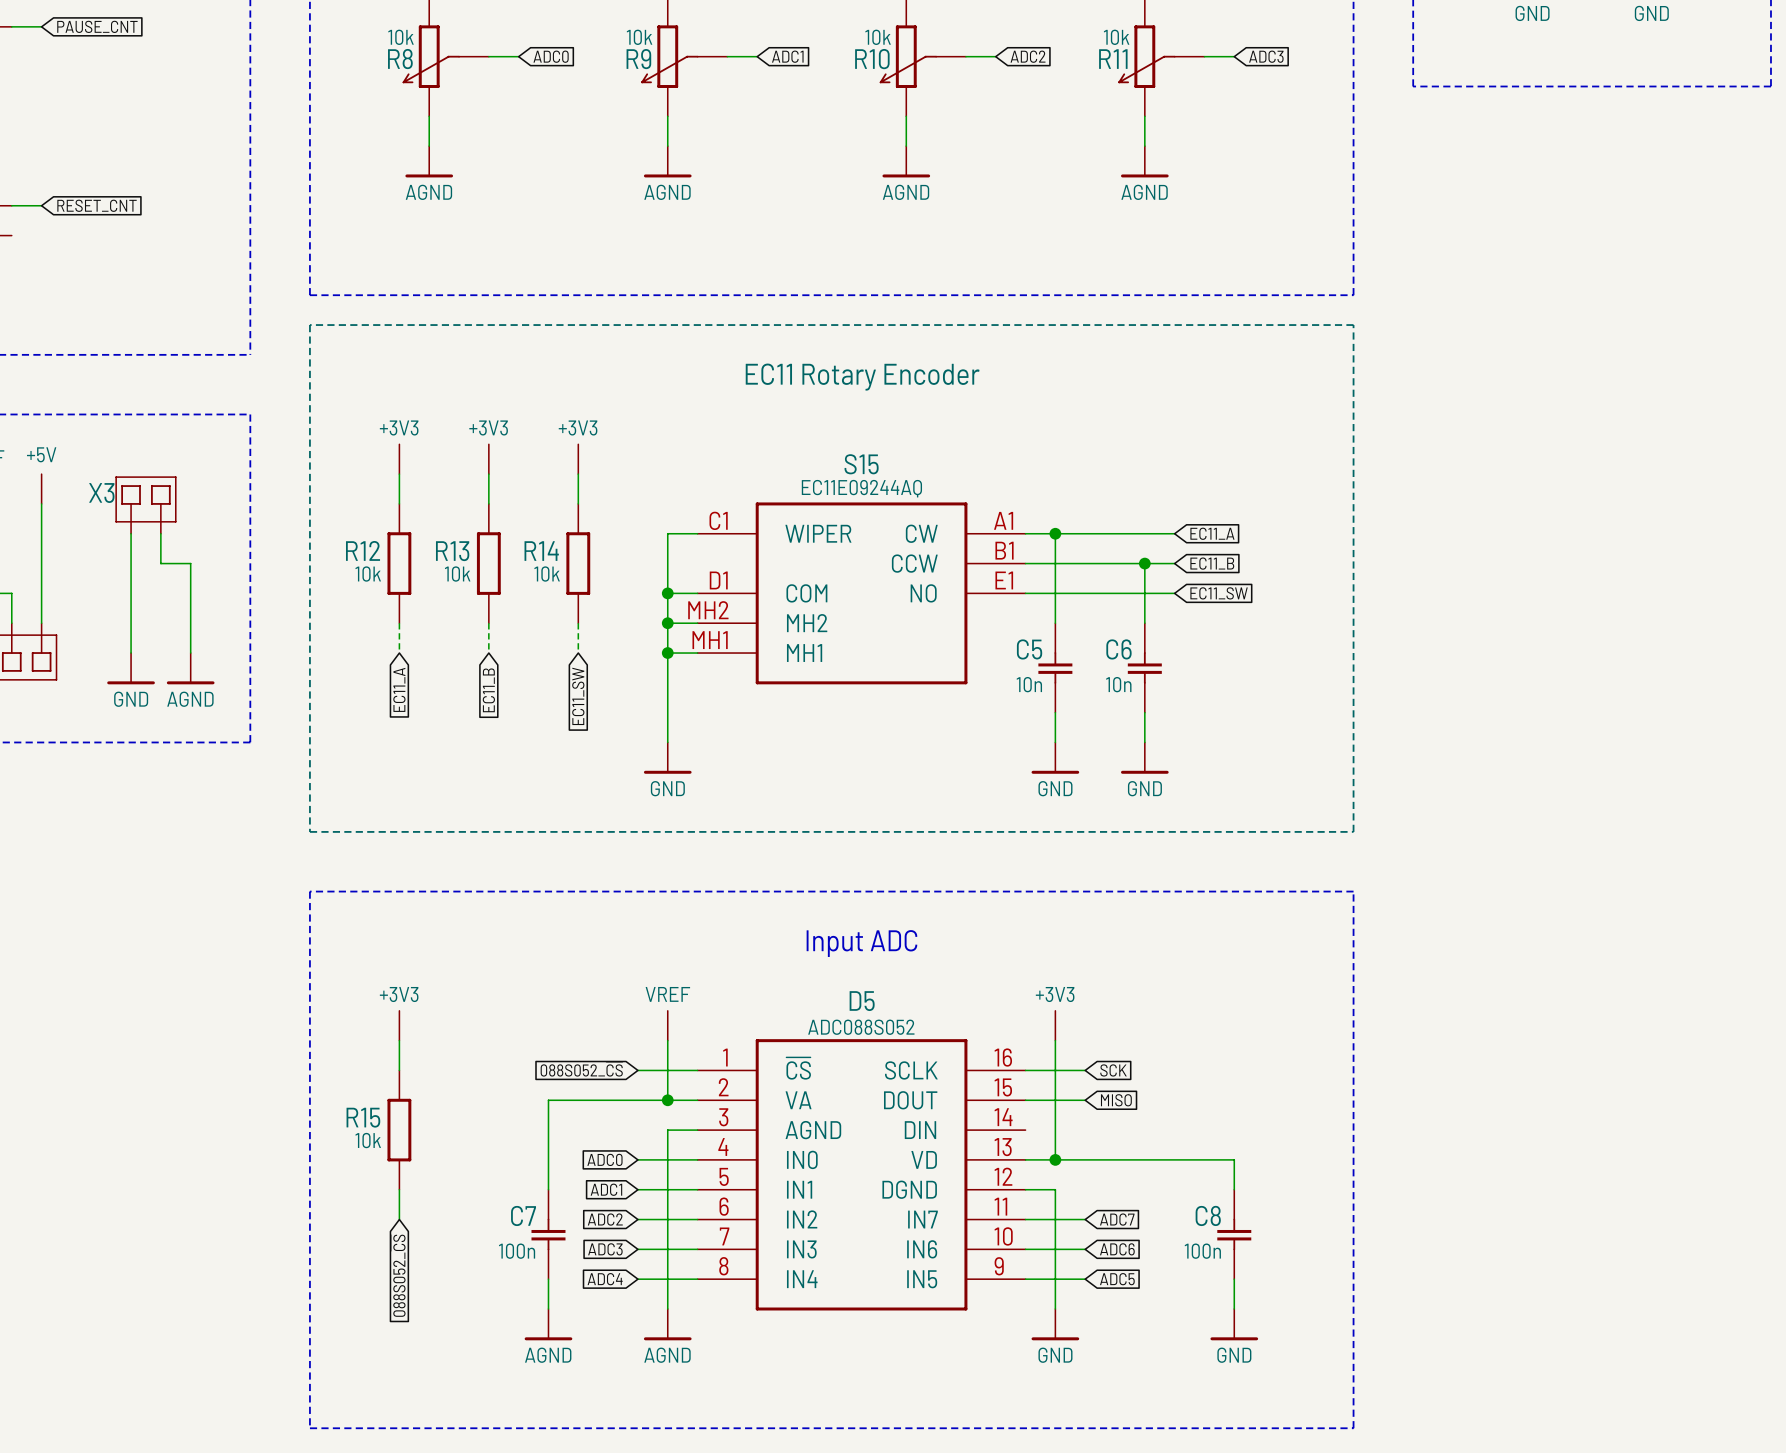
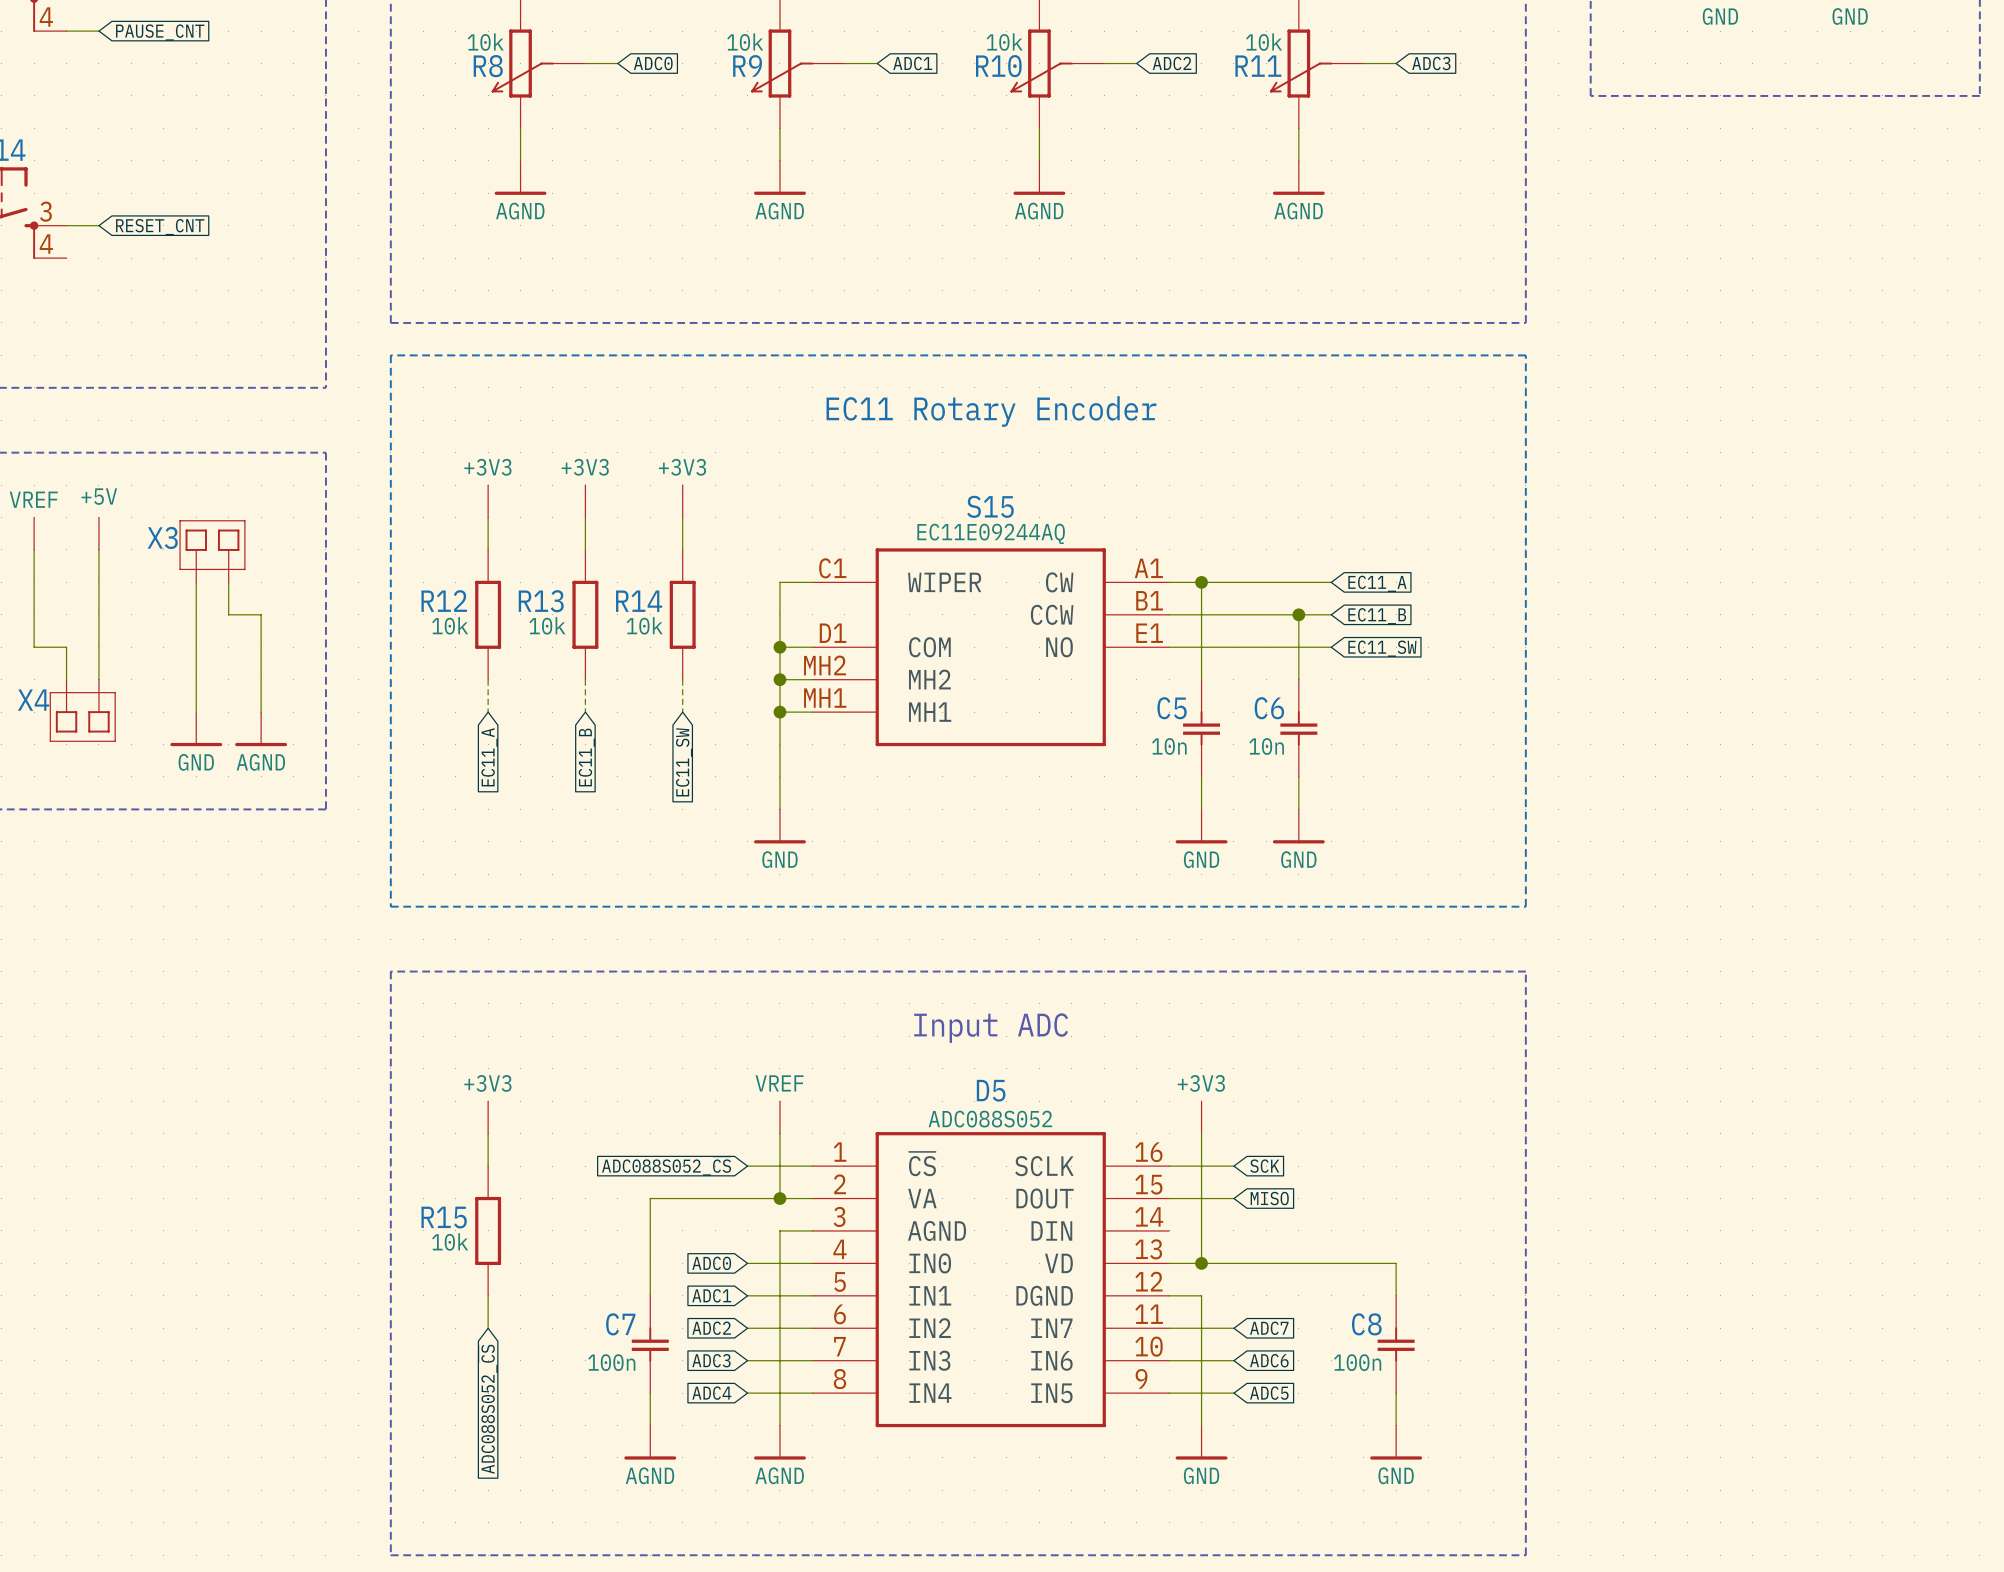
global label: 088S052_~{CS} (581, 1069) -> ADC088S052_~{CS} (666, 1166)
global label: 088S052_~{CS} (398, 1275) -> ADC088S052_~{CS} (488, 1409)

